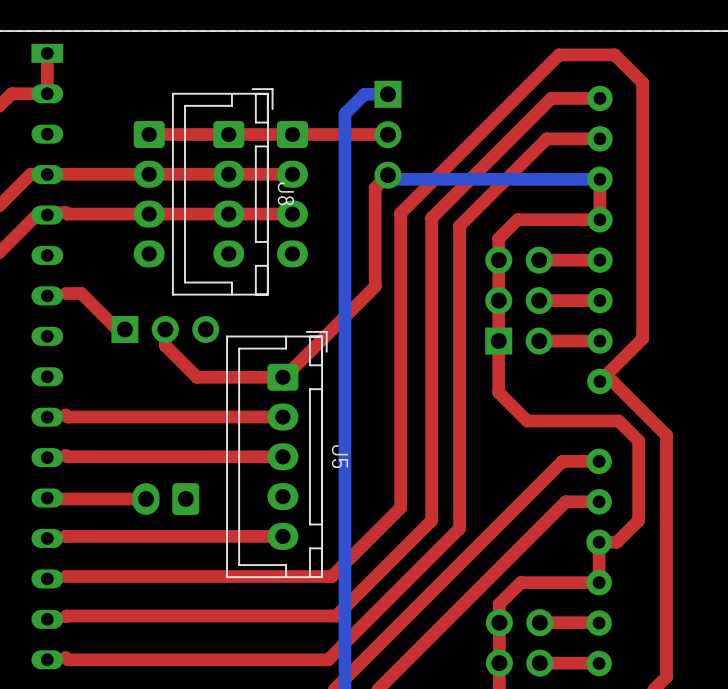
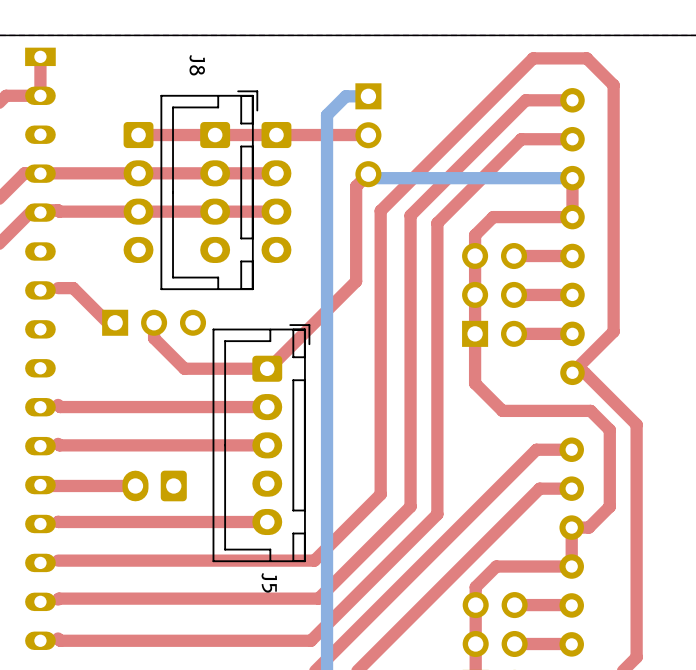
J8 name position: J8 (285, 193) -> J8 (197, 65)
J5 name position: J5 (339, 456) -> J5 (269, 582)

